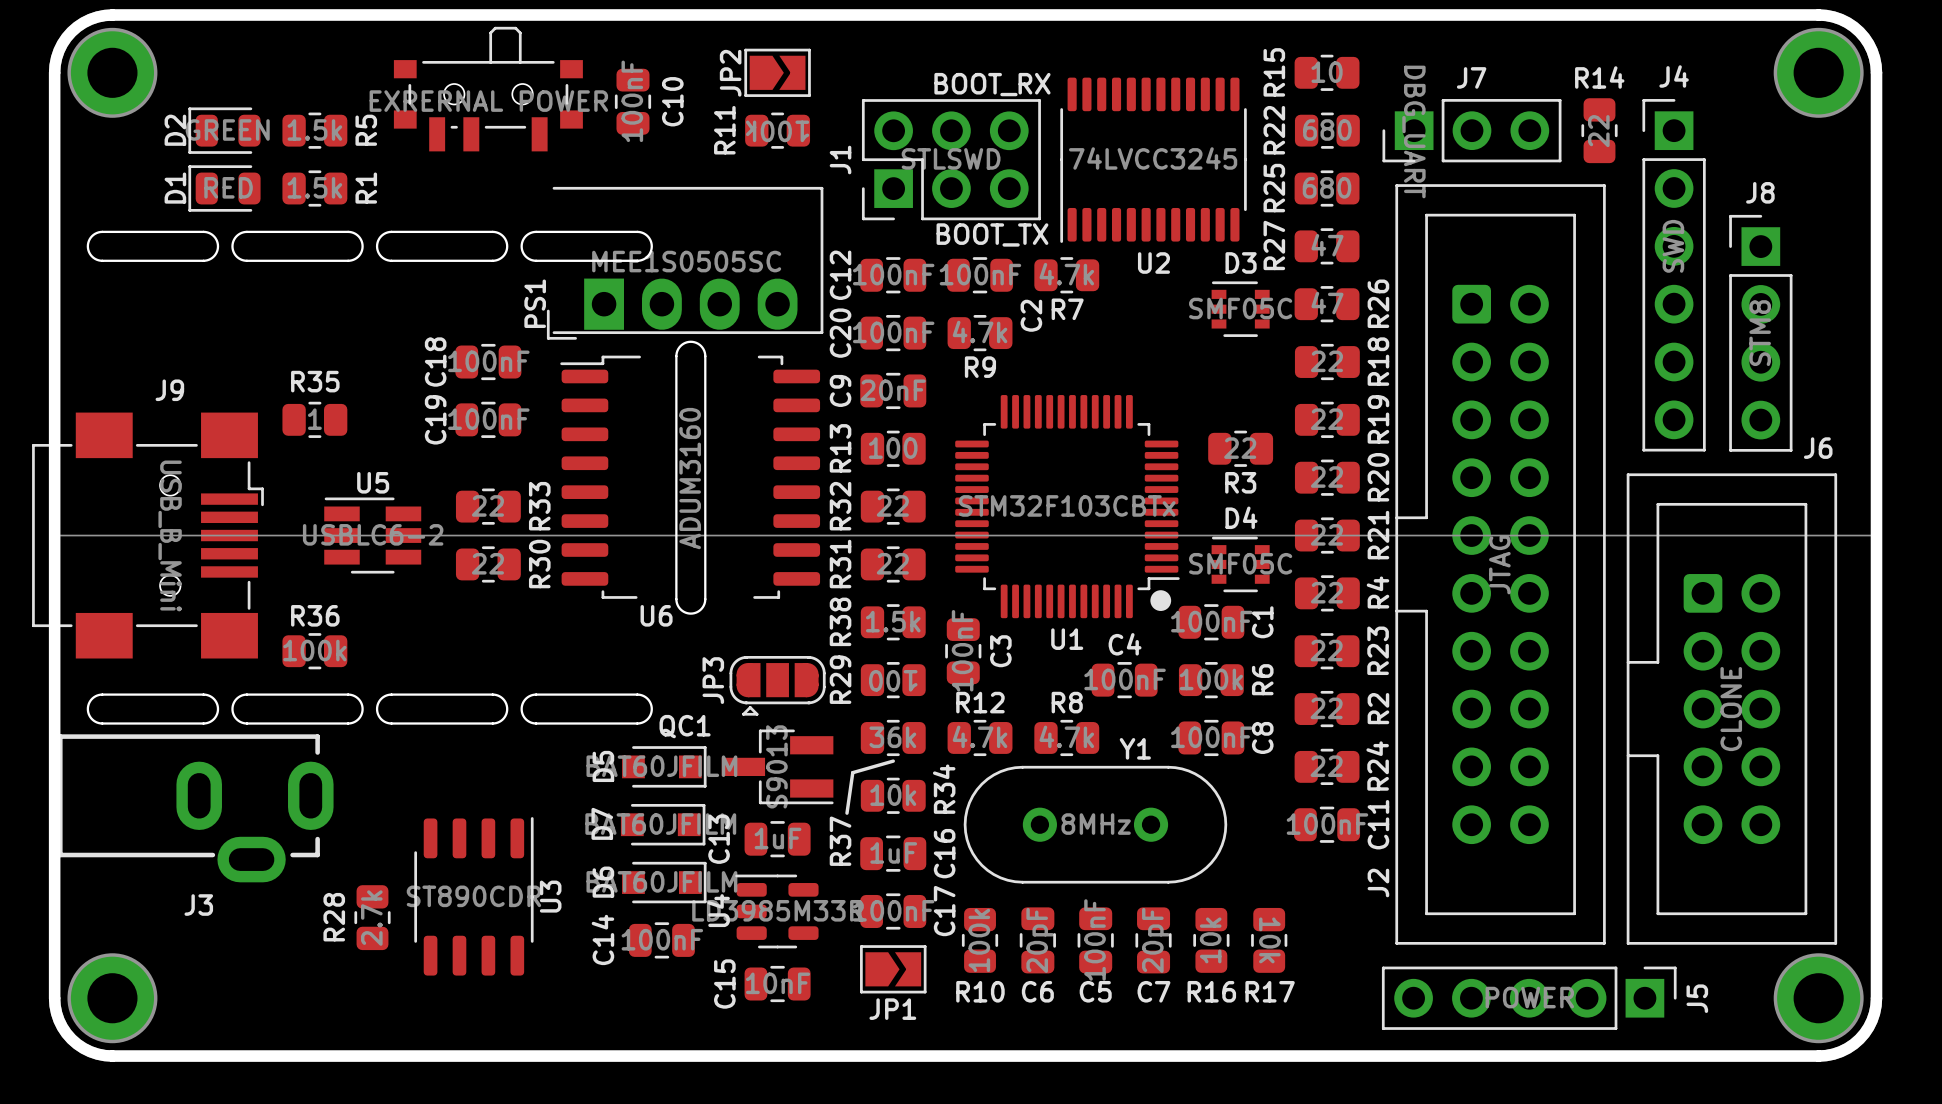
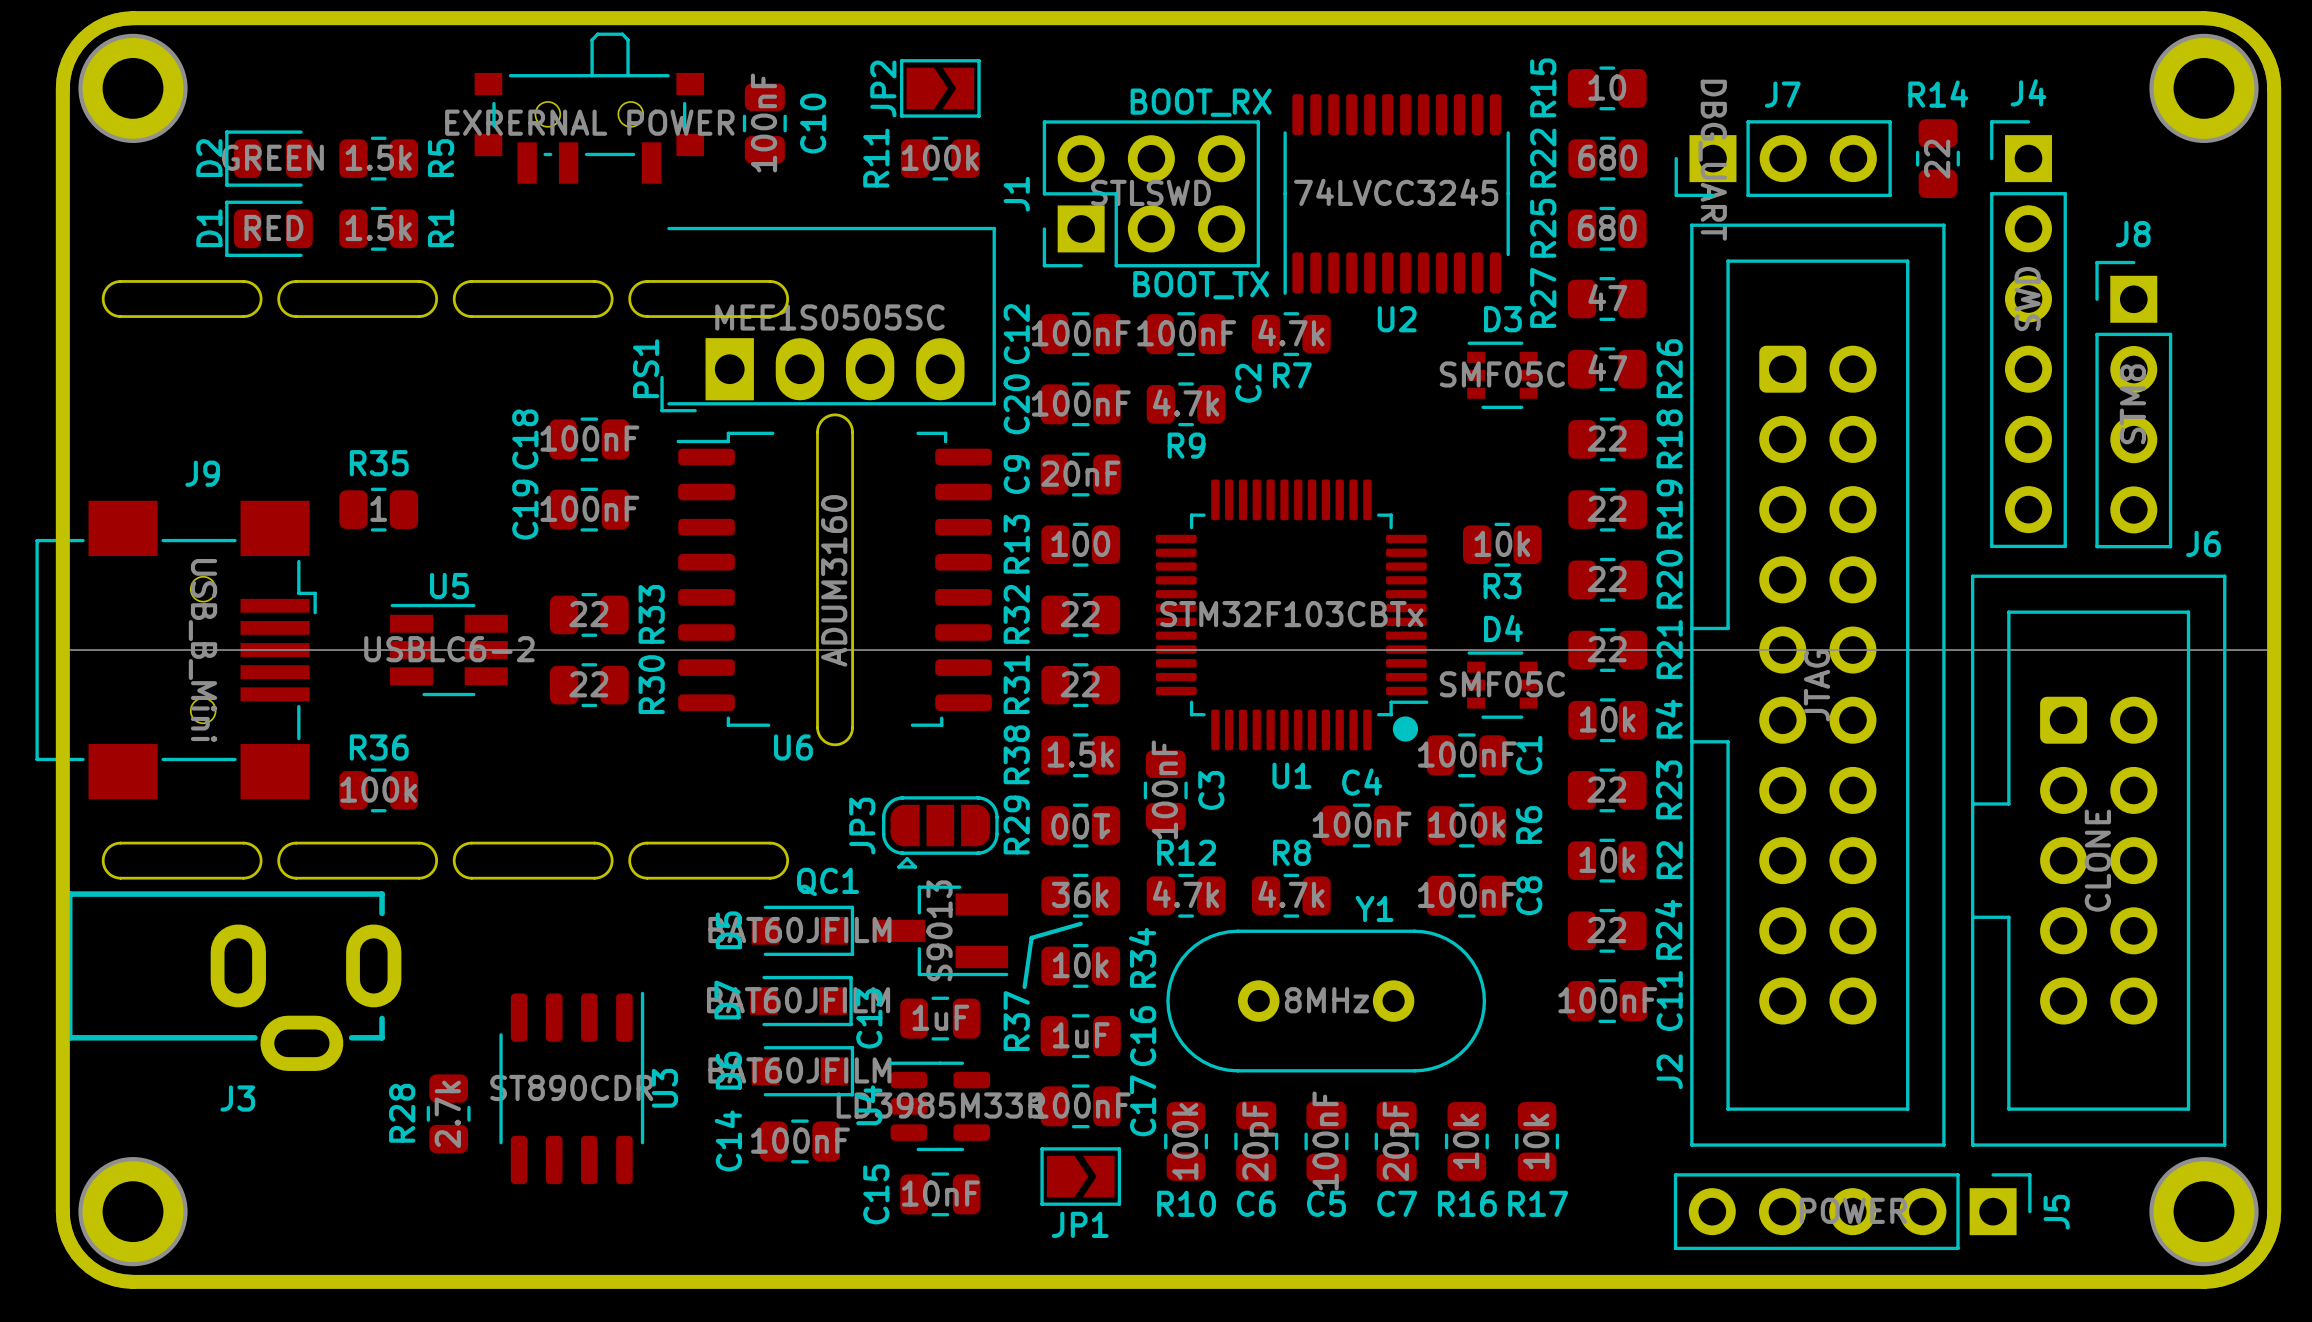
R11 value rotation: 0° (777, 131) -> 180° (940, 157)
R3 value: 22 (1240, 448) -> 10k (1502, 543)
R4 value: 22 (1326, 592) -> 10k (1607, 719)
R2 value: 22 (1326, 708) -> 10k (1607, 859)
R17 value rotation: 0° (1269, 940) -> 180° (1536, 1141)

